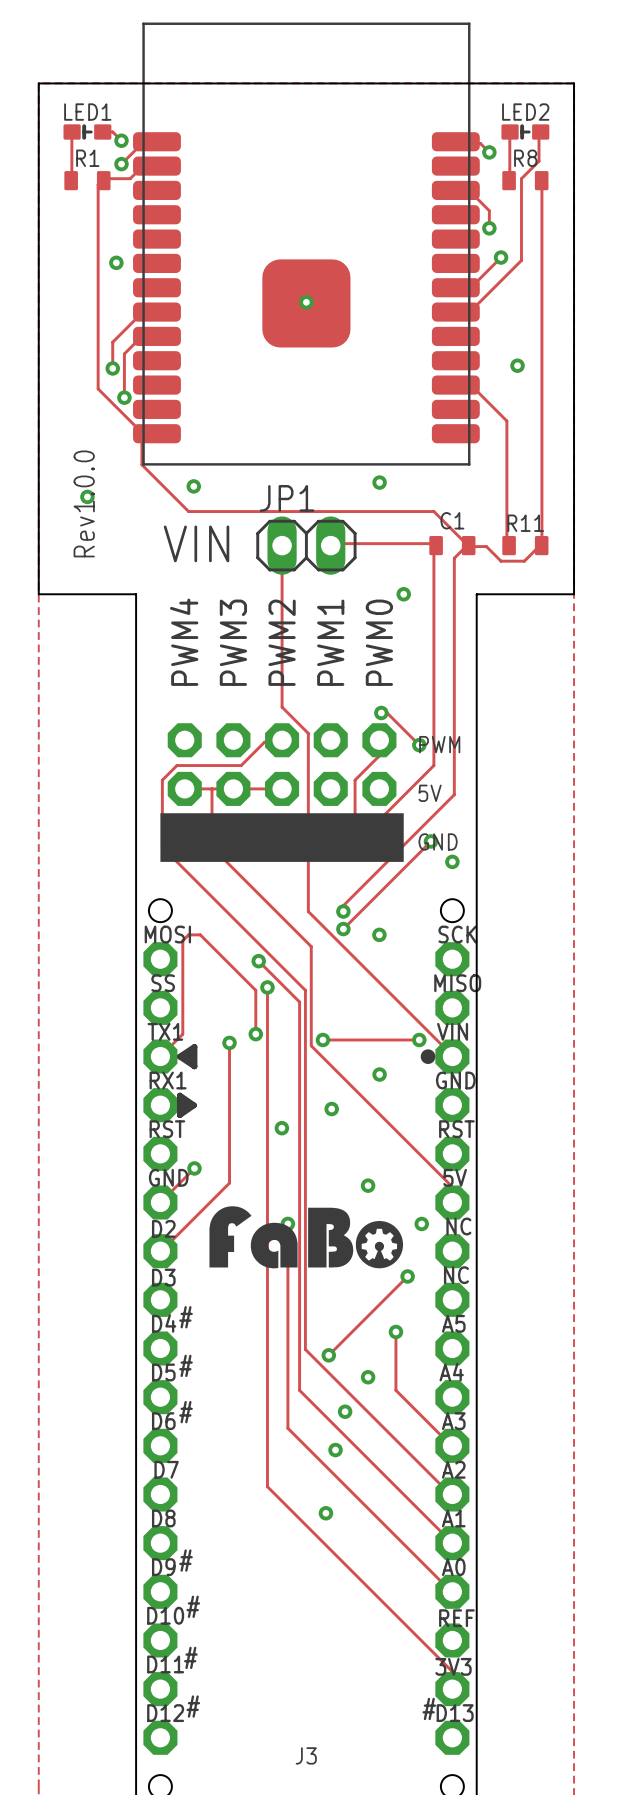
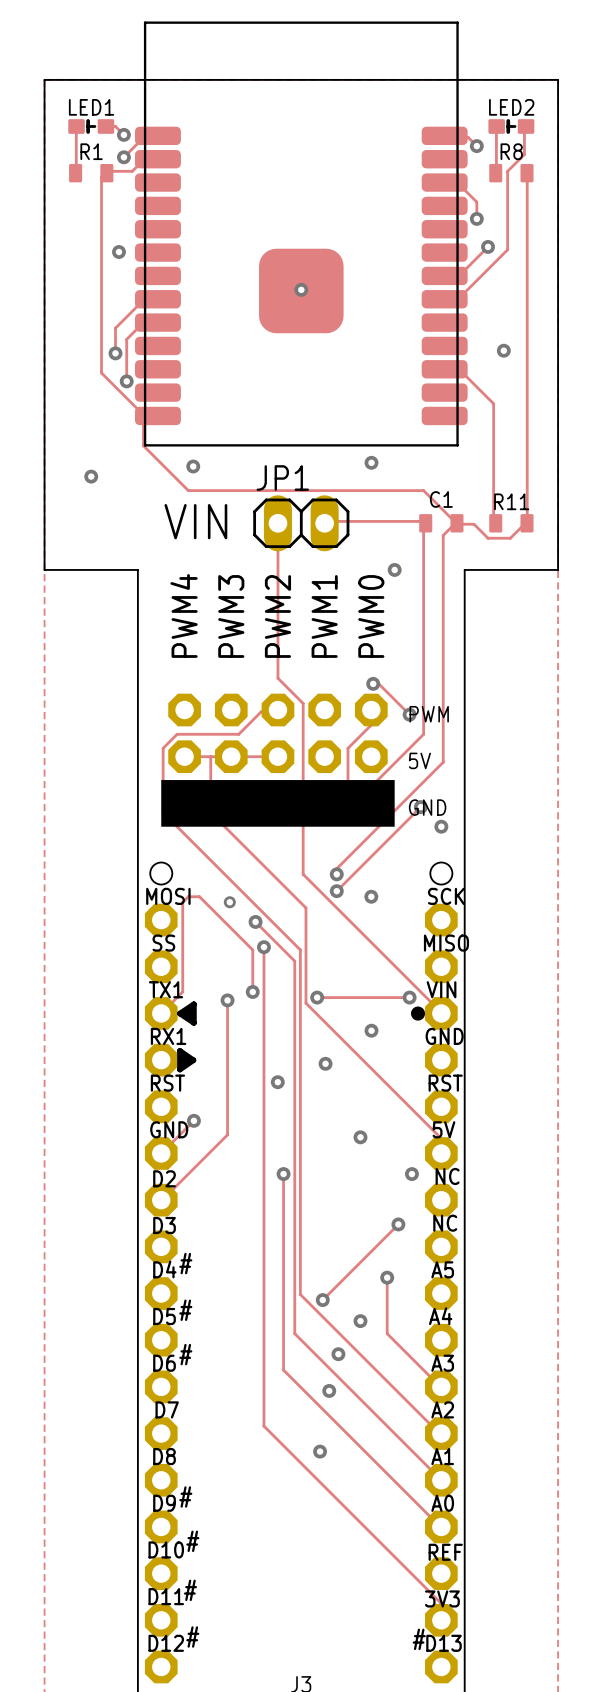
text: Rev1.0.0 (84, 503) -> none
via: none -> (229, 902)
drawing: [209, 1206, 404, 1269] -> none

